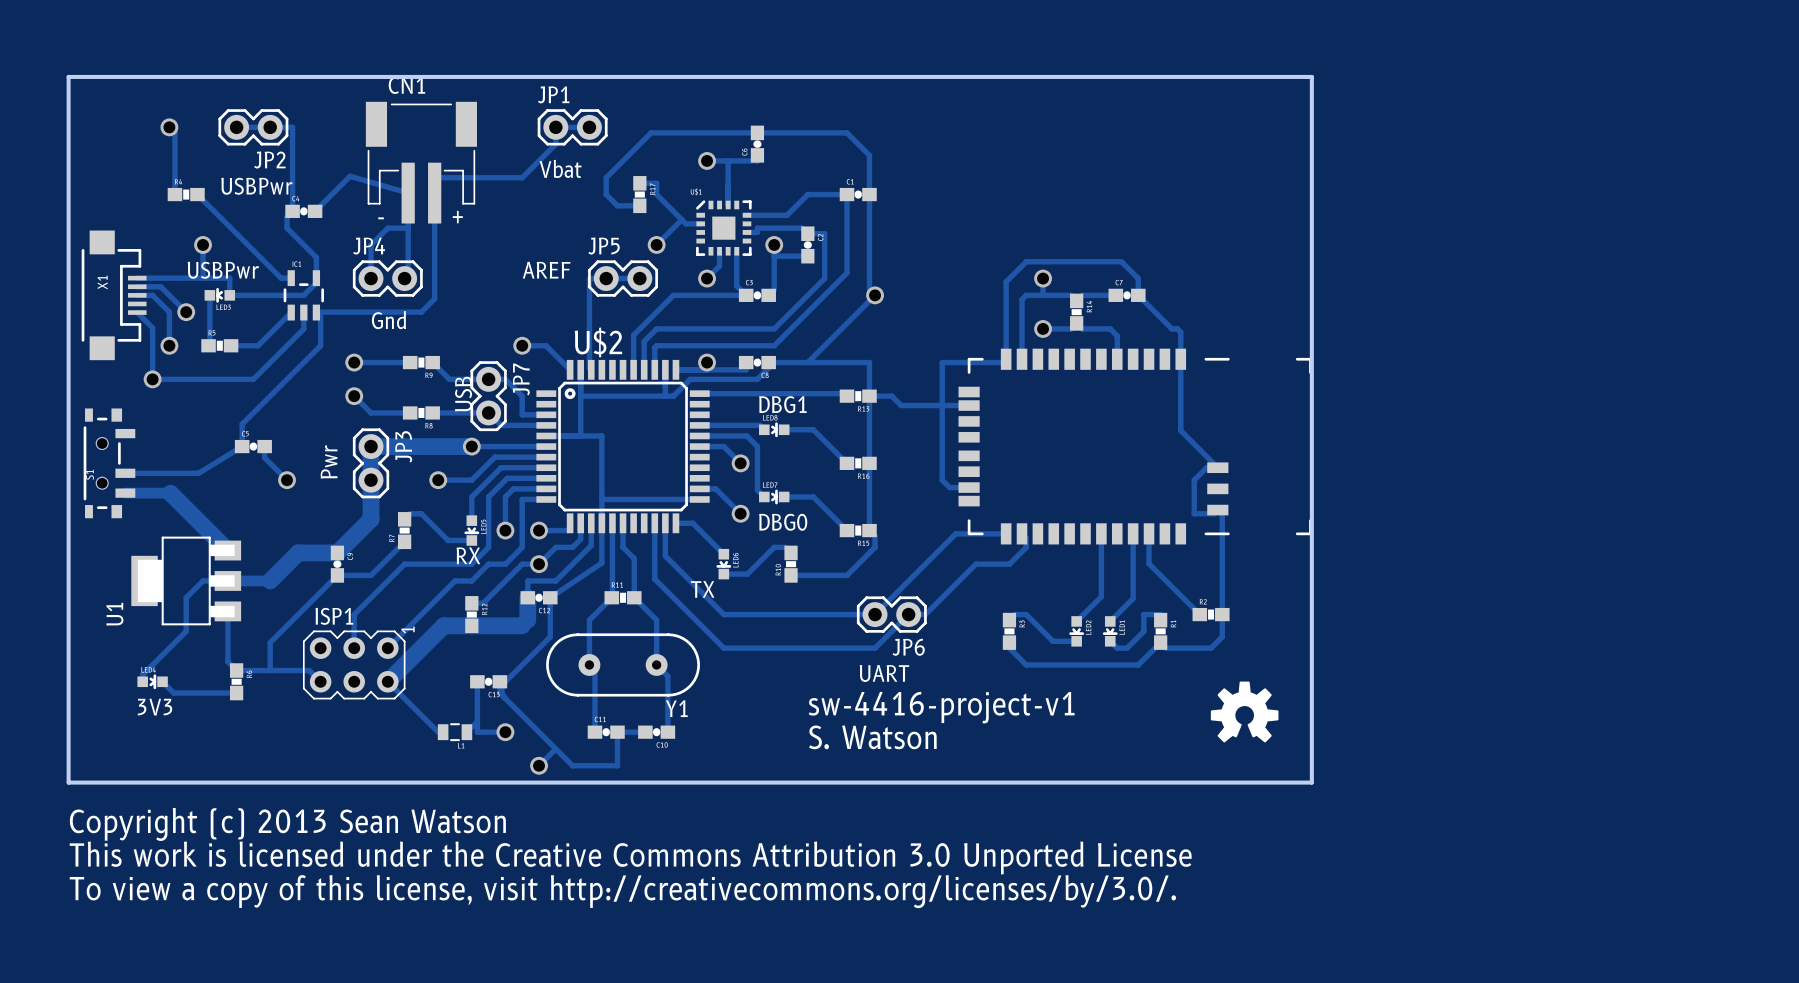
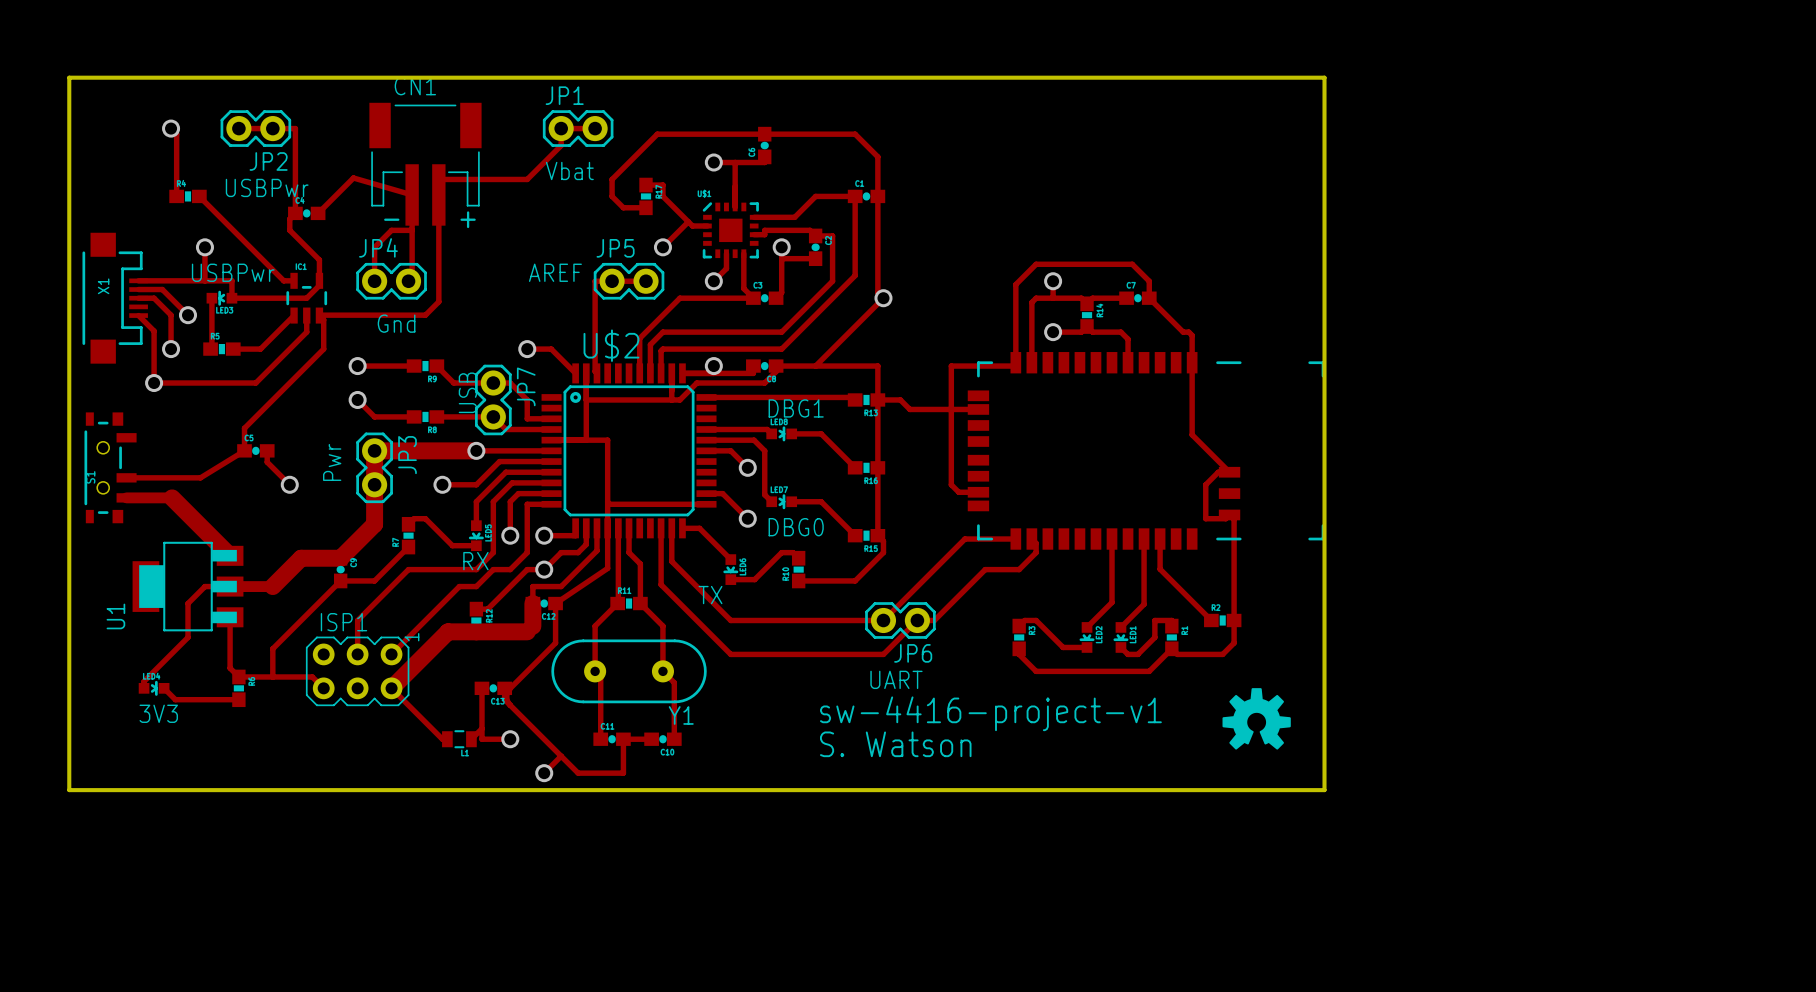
text: Copyright (c) 2013 Sean Watson (287, 824) -> none
text: This work is licensed under the Creative Commons Attribution 3.0 Unported License (630, 857) -> none
text: To view a copy of this license, visit http://creativecommons.org/licenses/by/3.0/. (622, 891) -> none

